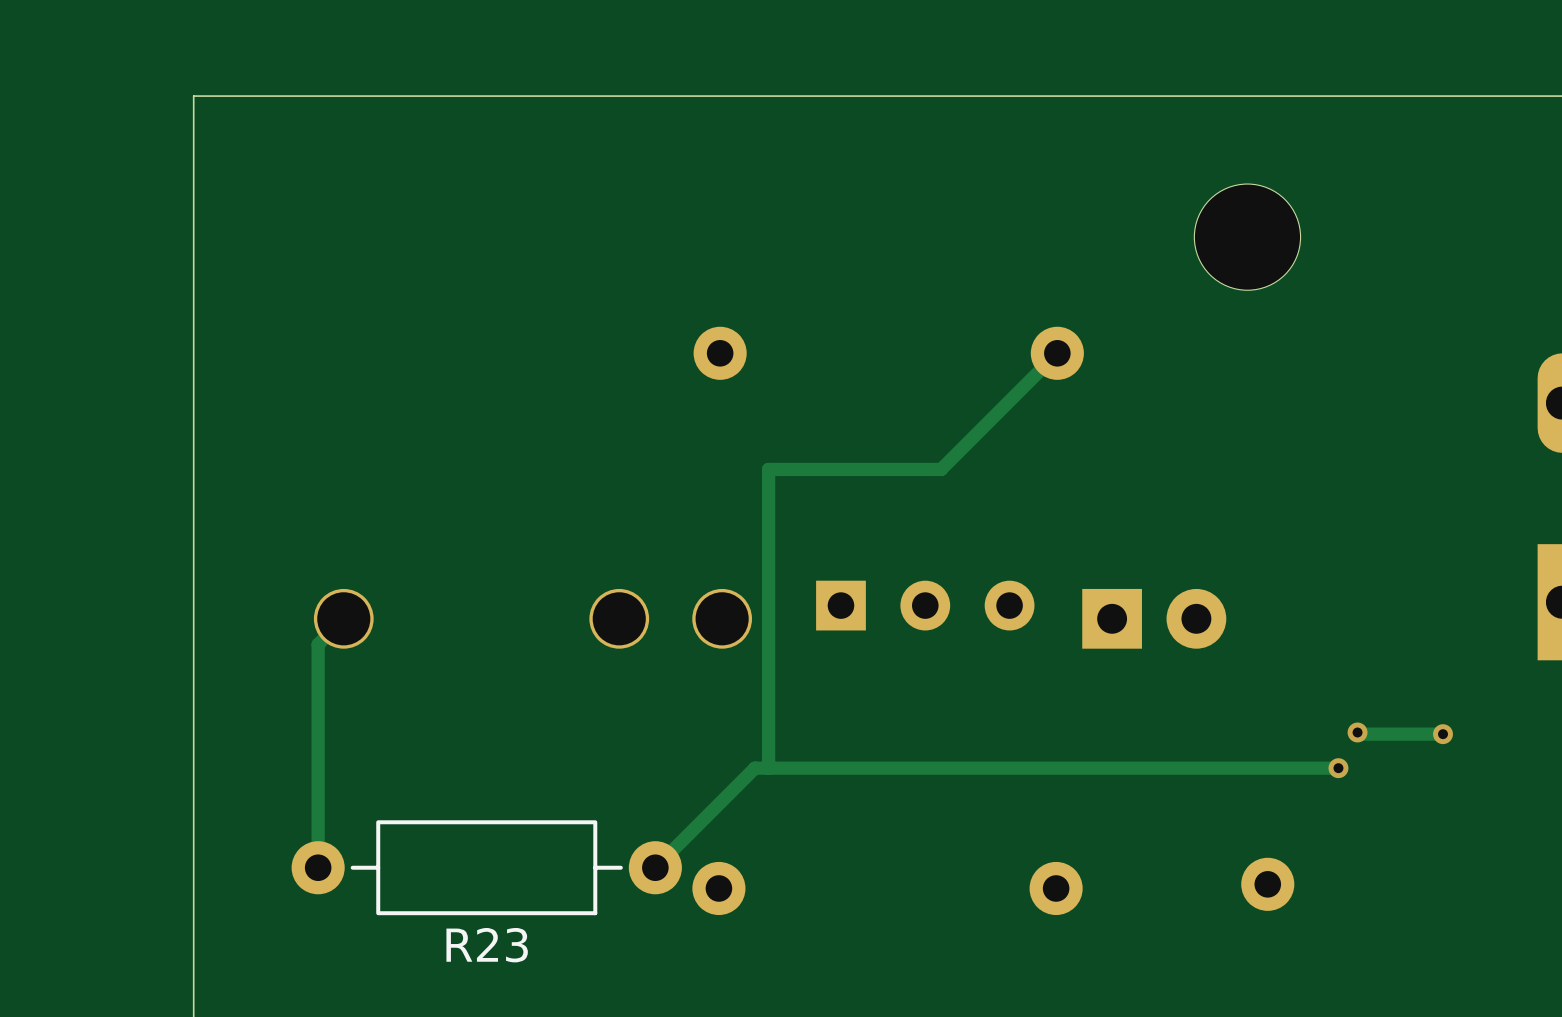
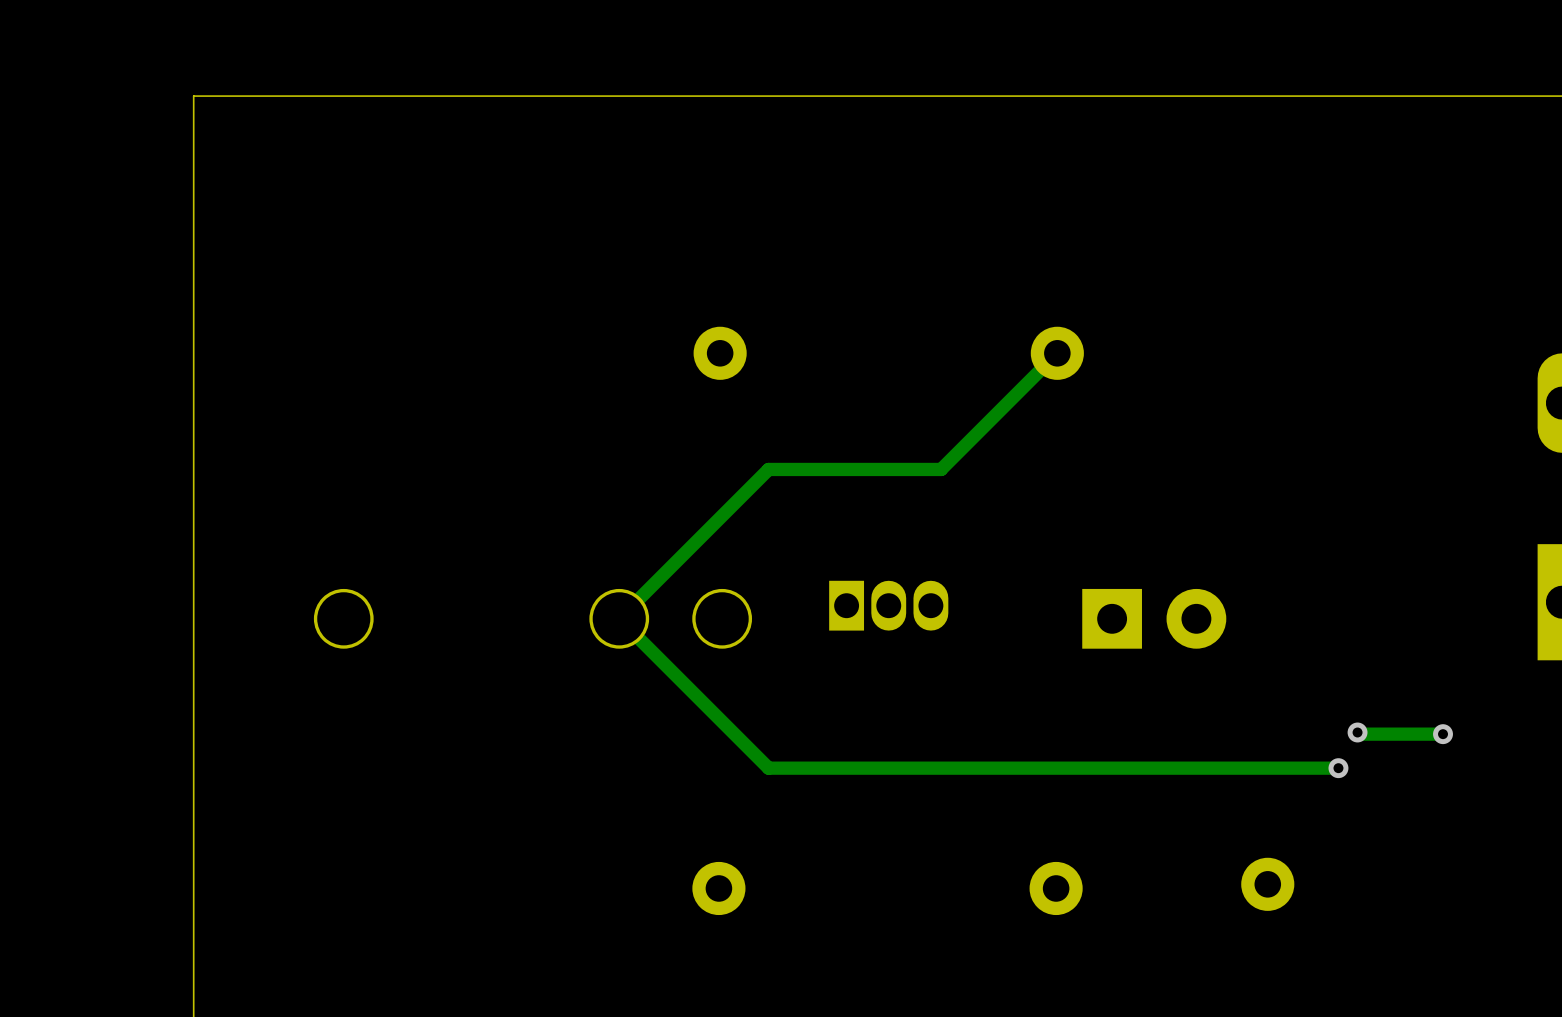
part: (1247, 237) -> none
track: (768, 469) (768, 768) (754, 768) (655, 867) -> (768, 469) (619, 618) (768, 768)
part: none -> (888, 605)
part: (925, 605) -> none
track: (343, 618) (318, 644) (318, 867) -> none
R23: (486, 867) -> none

